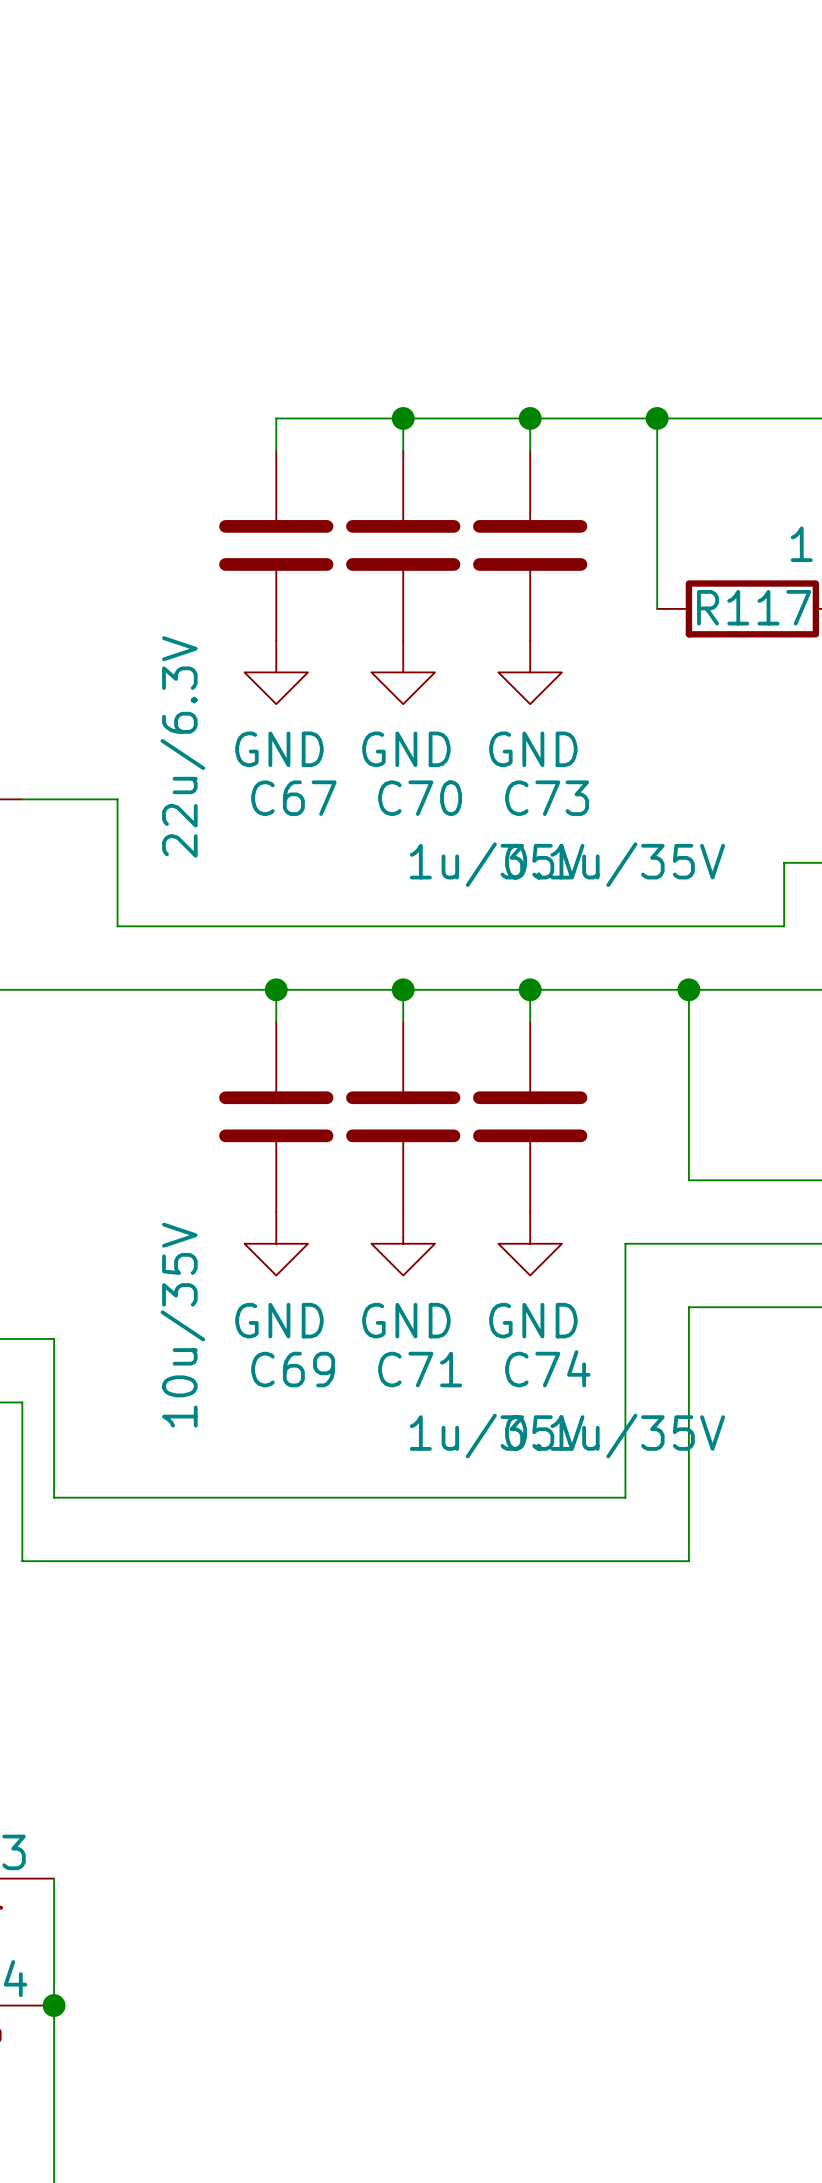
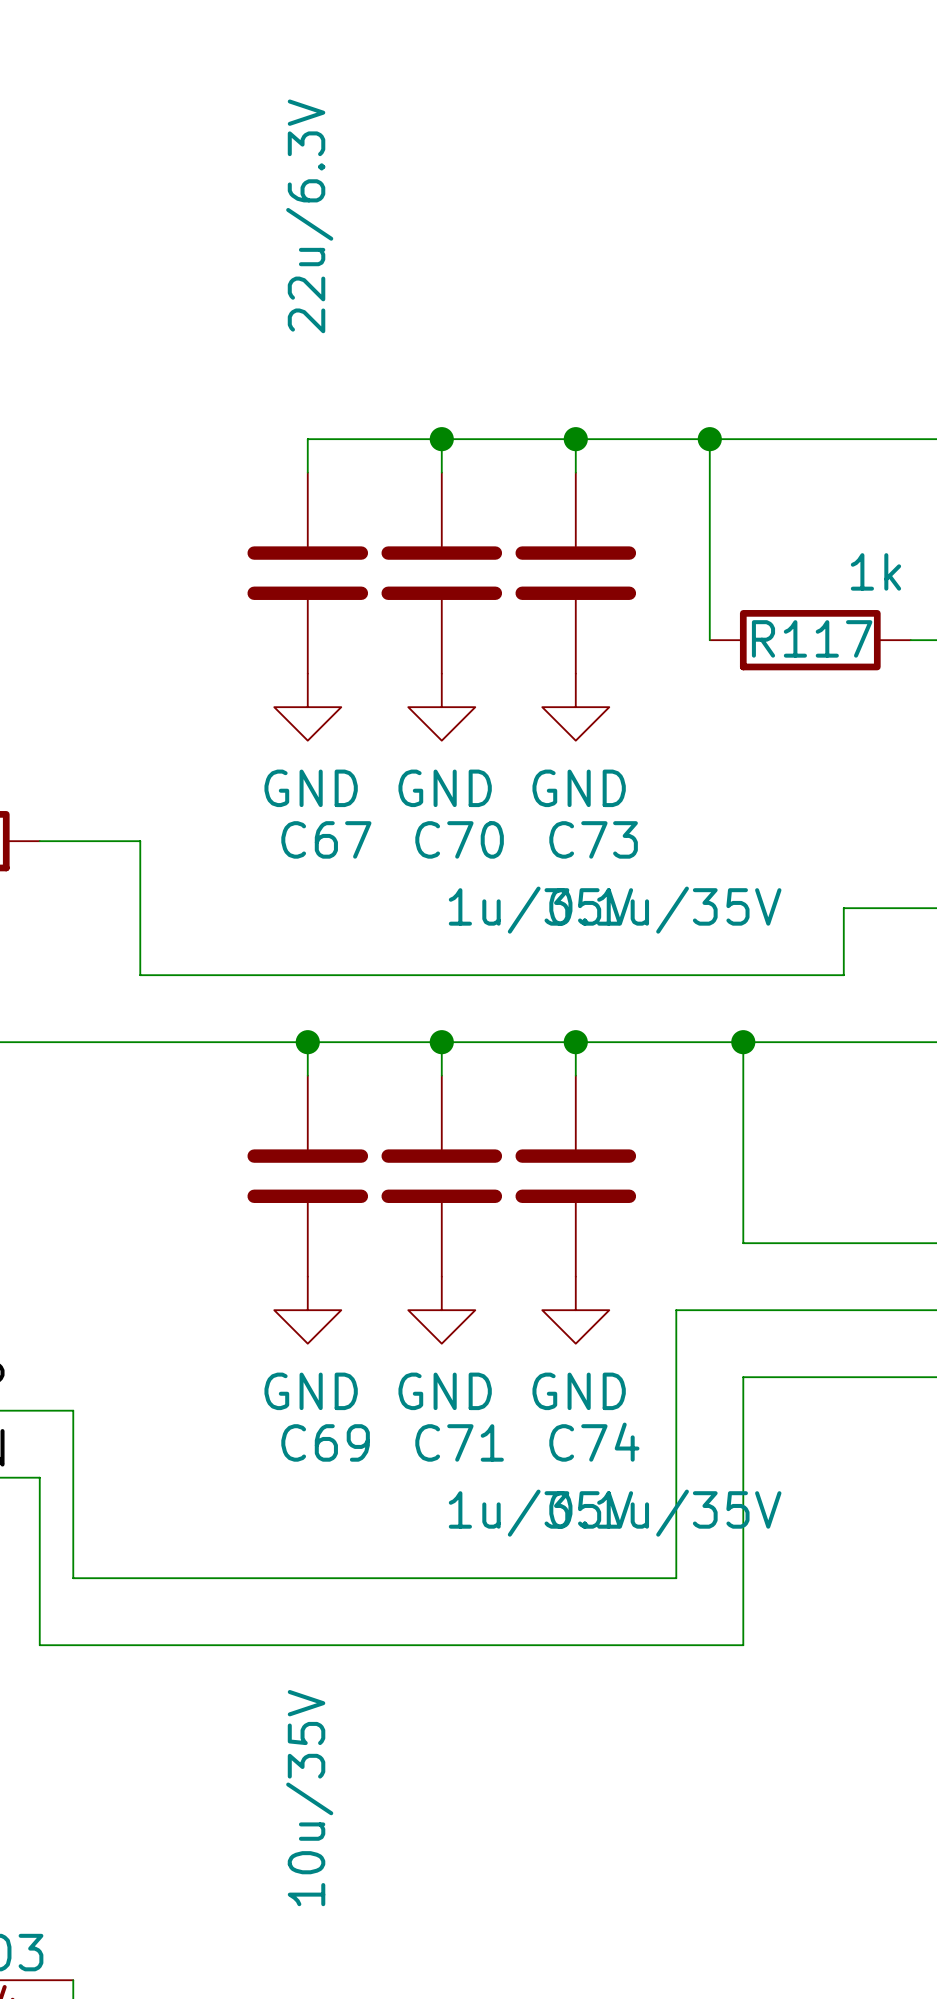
C67 value position: 22u/6.3V (182, 746) -> 22u/6.3V (309, 216)
C69 value position: 10u/35V (182, 1325) -> 10u/35V (309, 1798)

